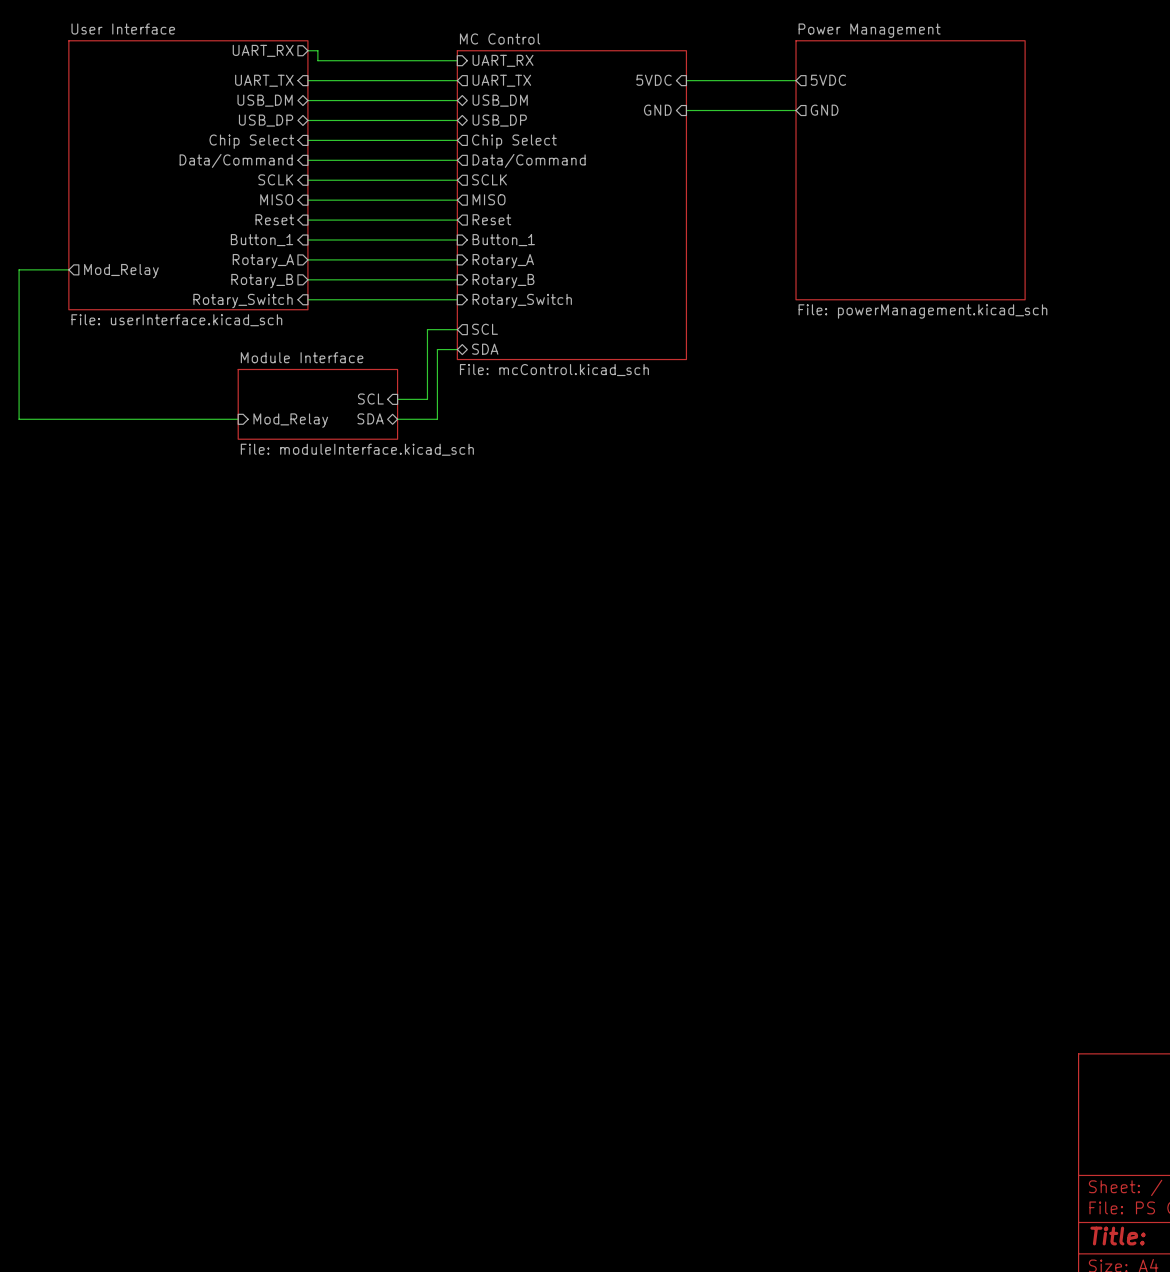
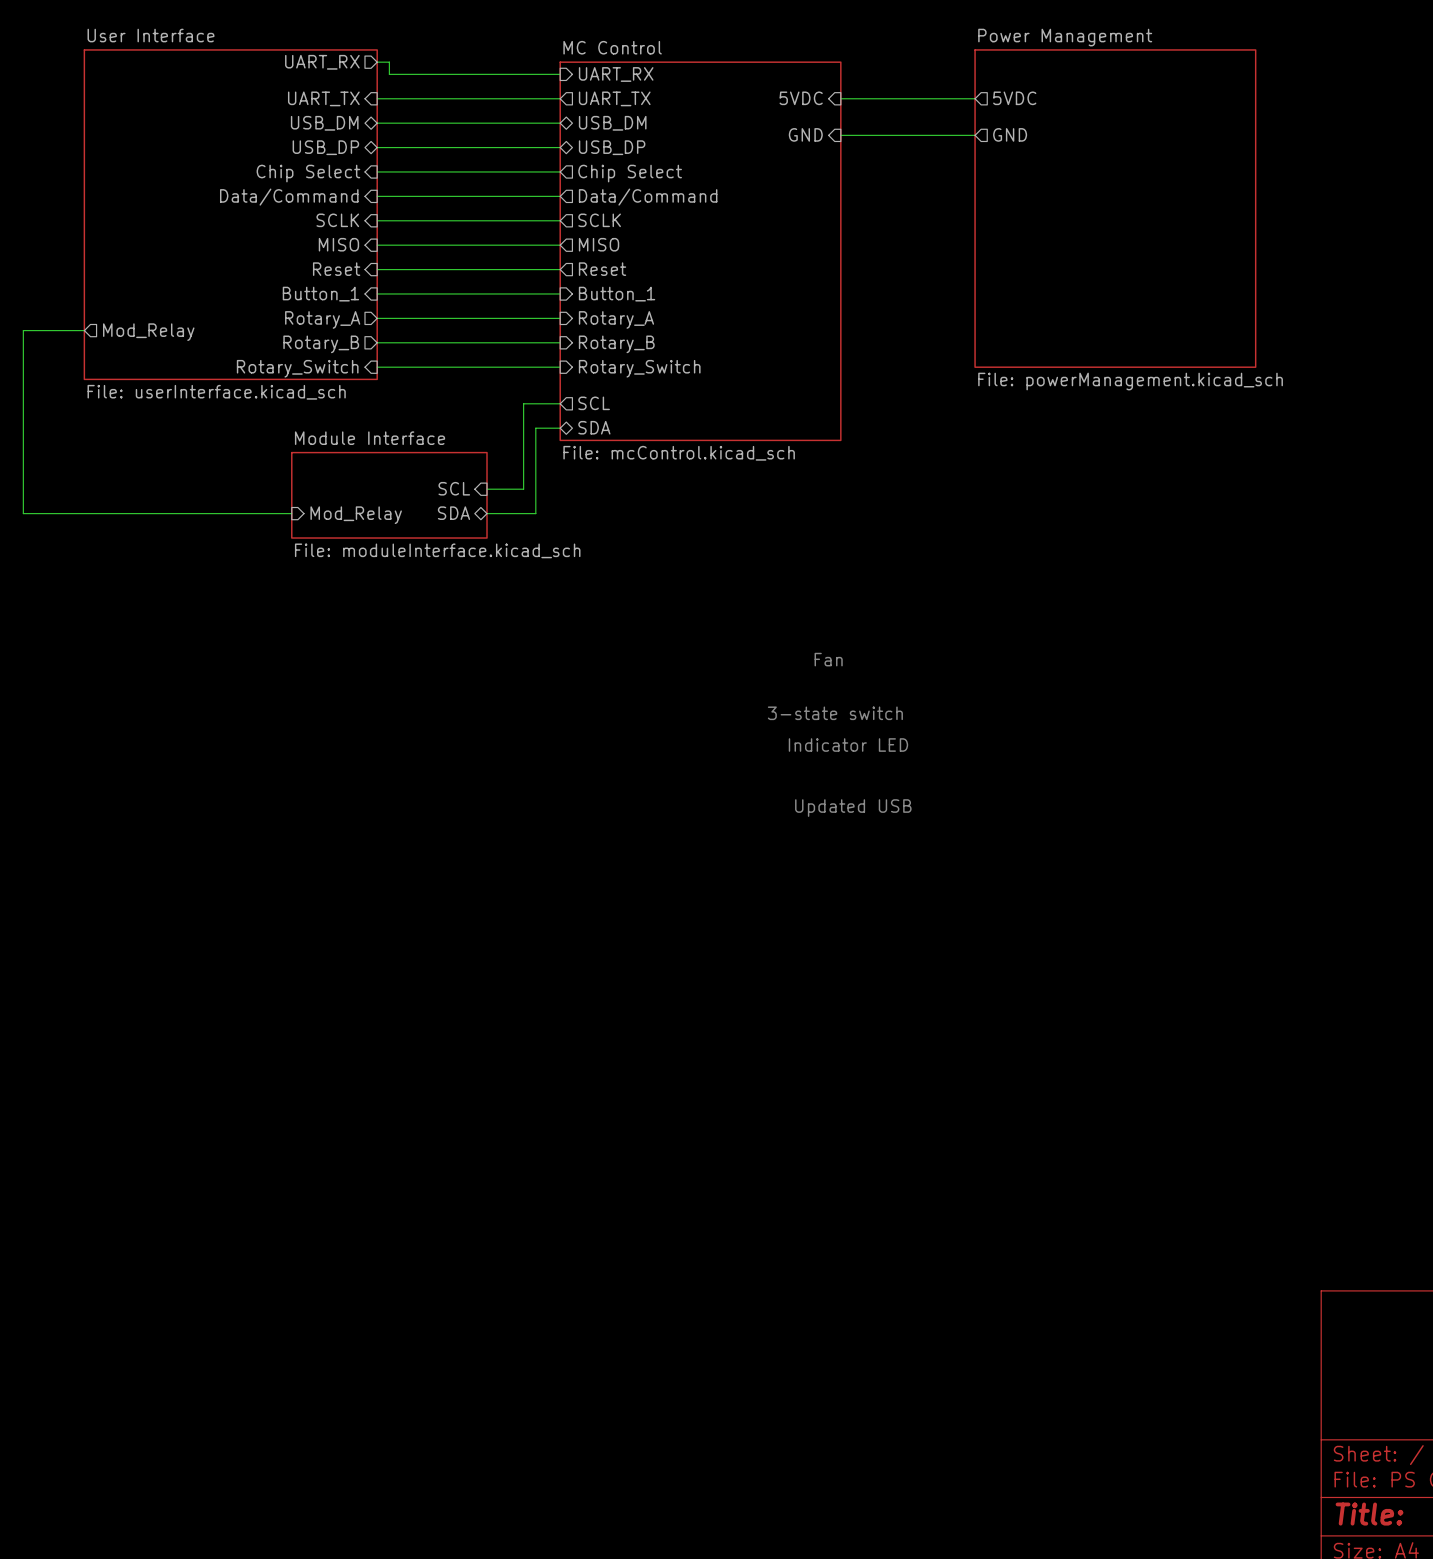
text: none -> Fan (828, 659)
text: none -> 3-state switch (835, 713)
text: none -> Indicator LED (848, 745)
text: none -> Updated USB (853, 808)

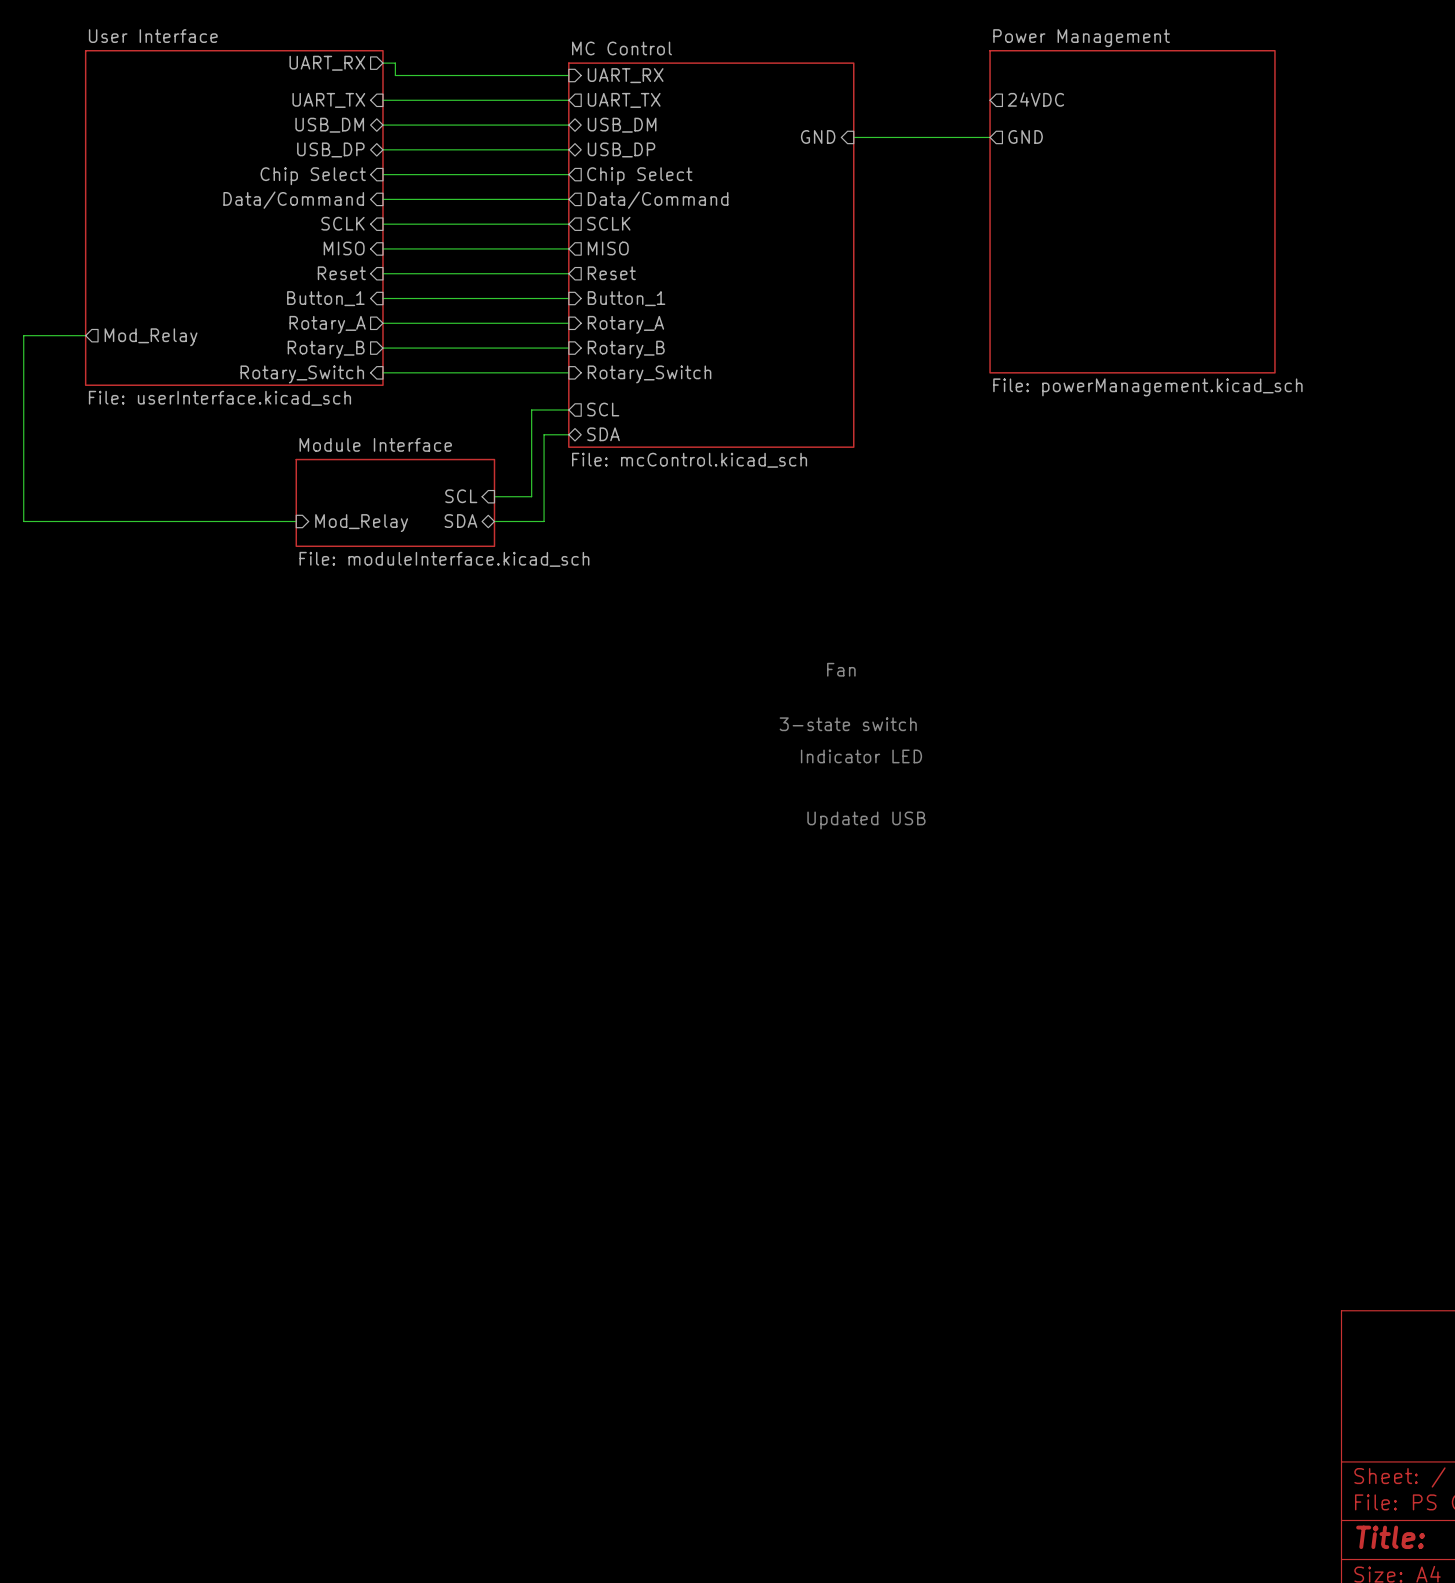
sheet pin: 5VDC (801, 98) -> none
wire: (840, 98) (975, 98) -> none
sheet pin: 5VDC (1014, 98) -> 24VDC (1035, 99)

